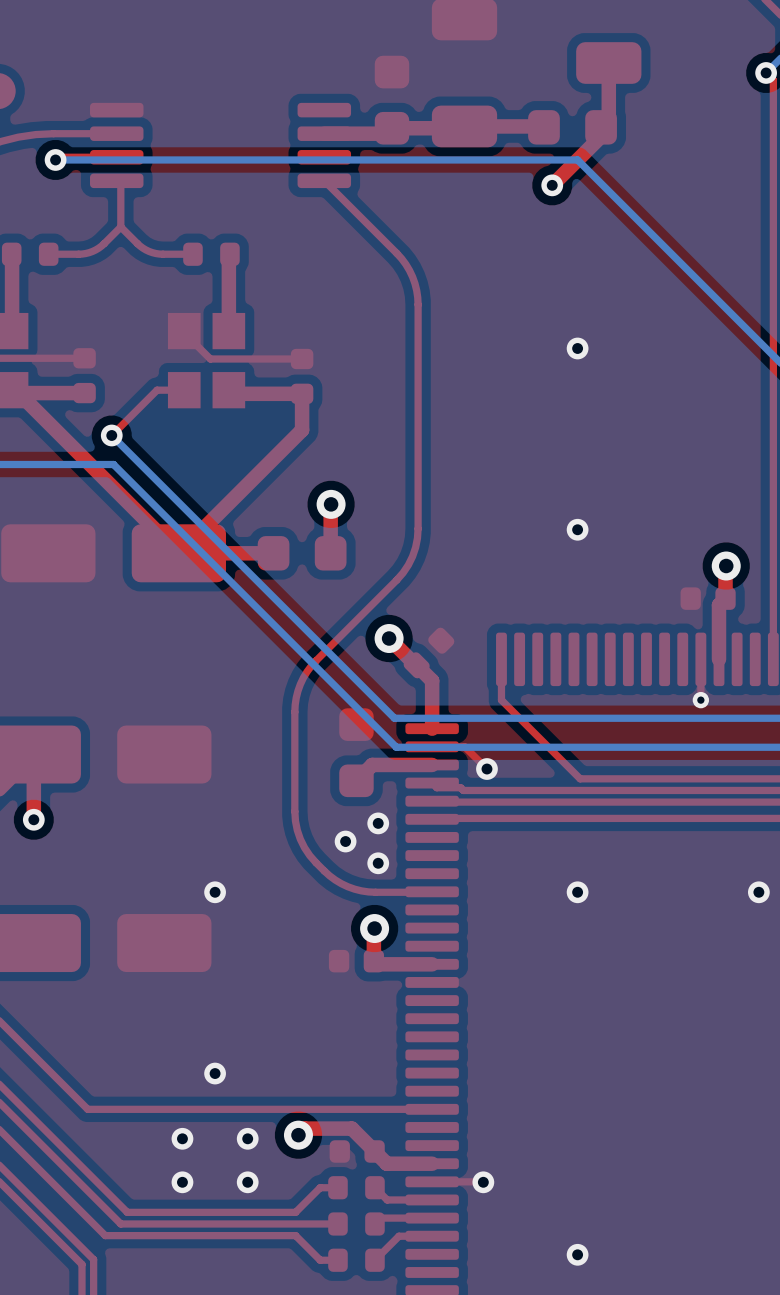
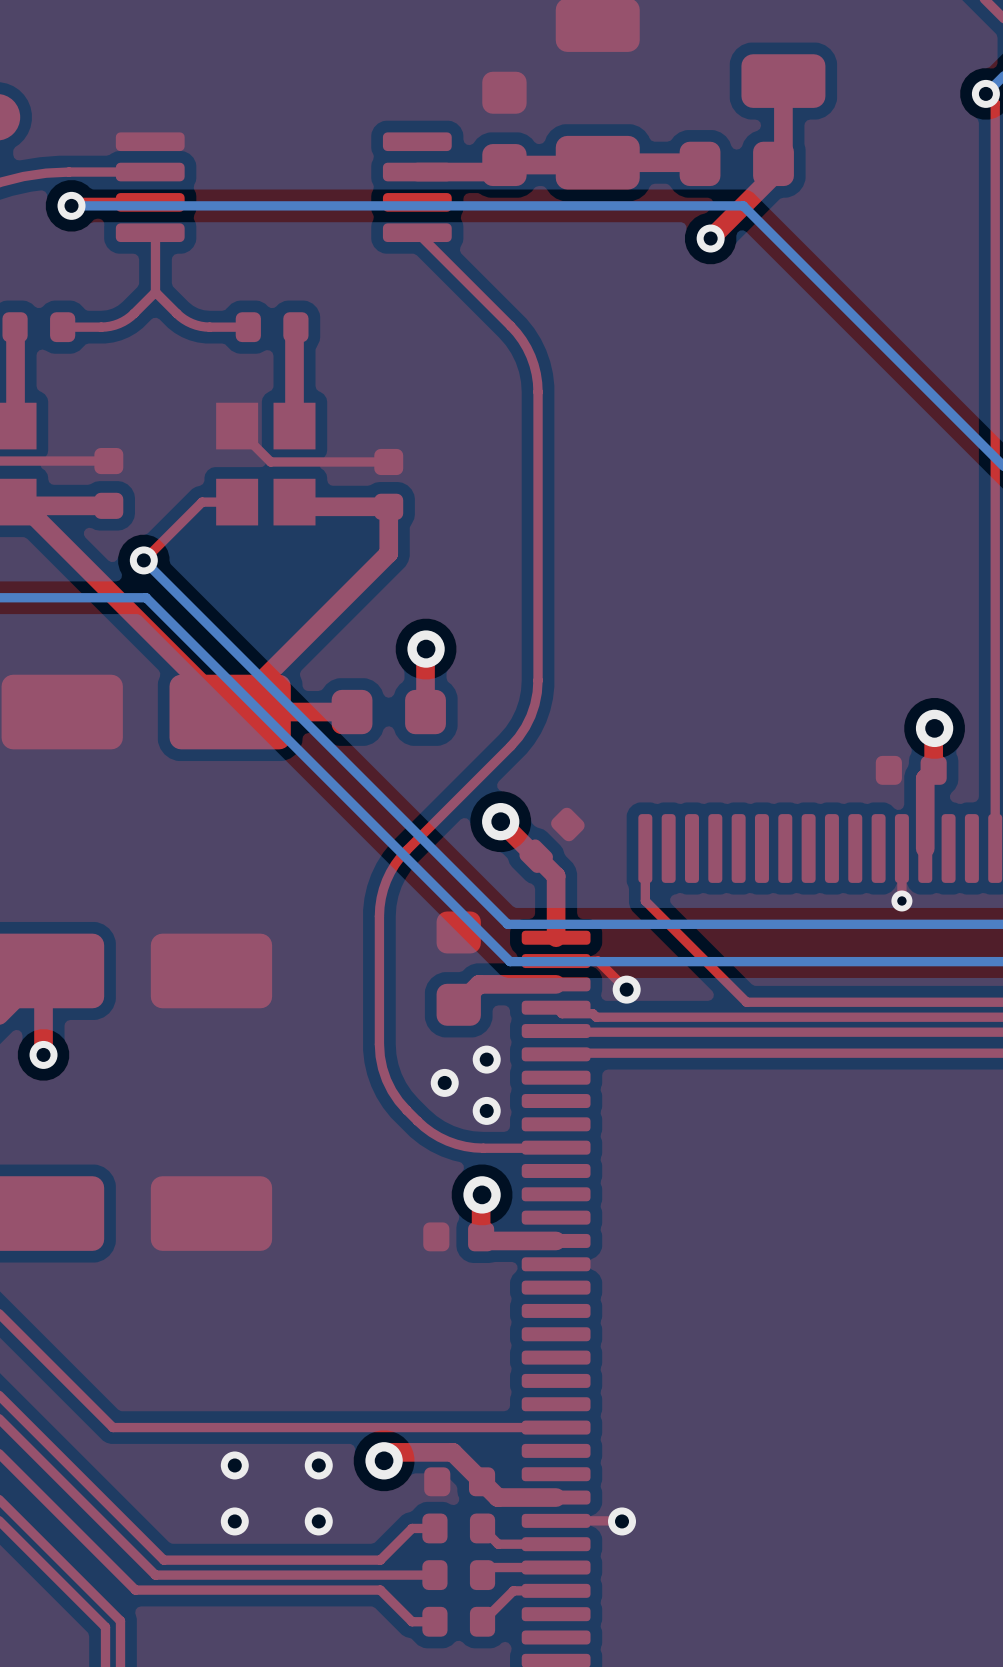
via: (577, 348) -> none
via: (577, 529) -> none
via: (215, 892) -> none
via: (577, 892) -> none
via: (758, 892) -> none
via: (215, 1073) -> none
via: (577, 1254) -> none

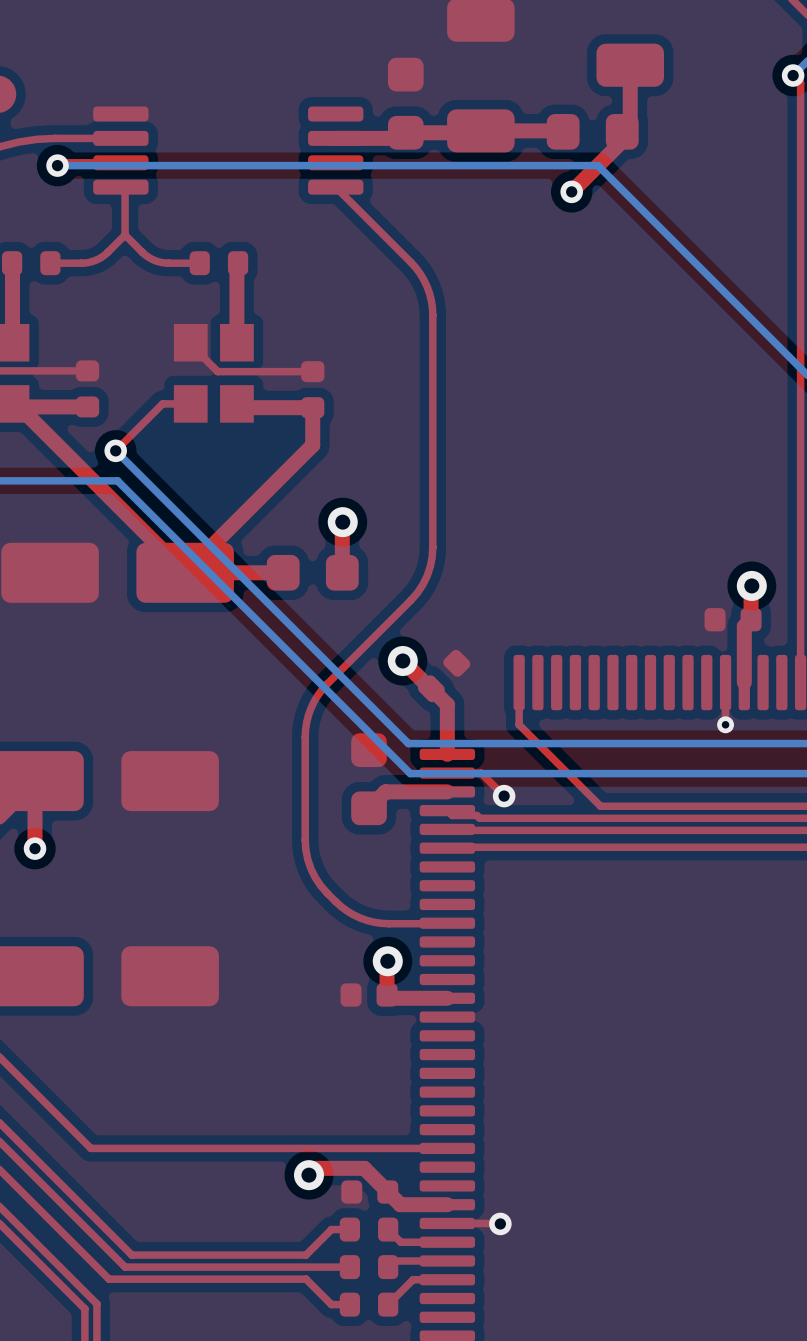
via: (486, 1059) -> none
via: (444, 1082) -> none
via: (486, 1110) -> none
via: (234, 1465) -> none
via: (318, 1465) -> none
via: (234, 1521) -> none
via: (318, 1521) -> none

